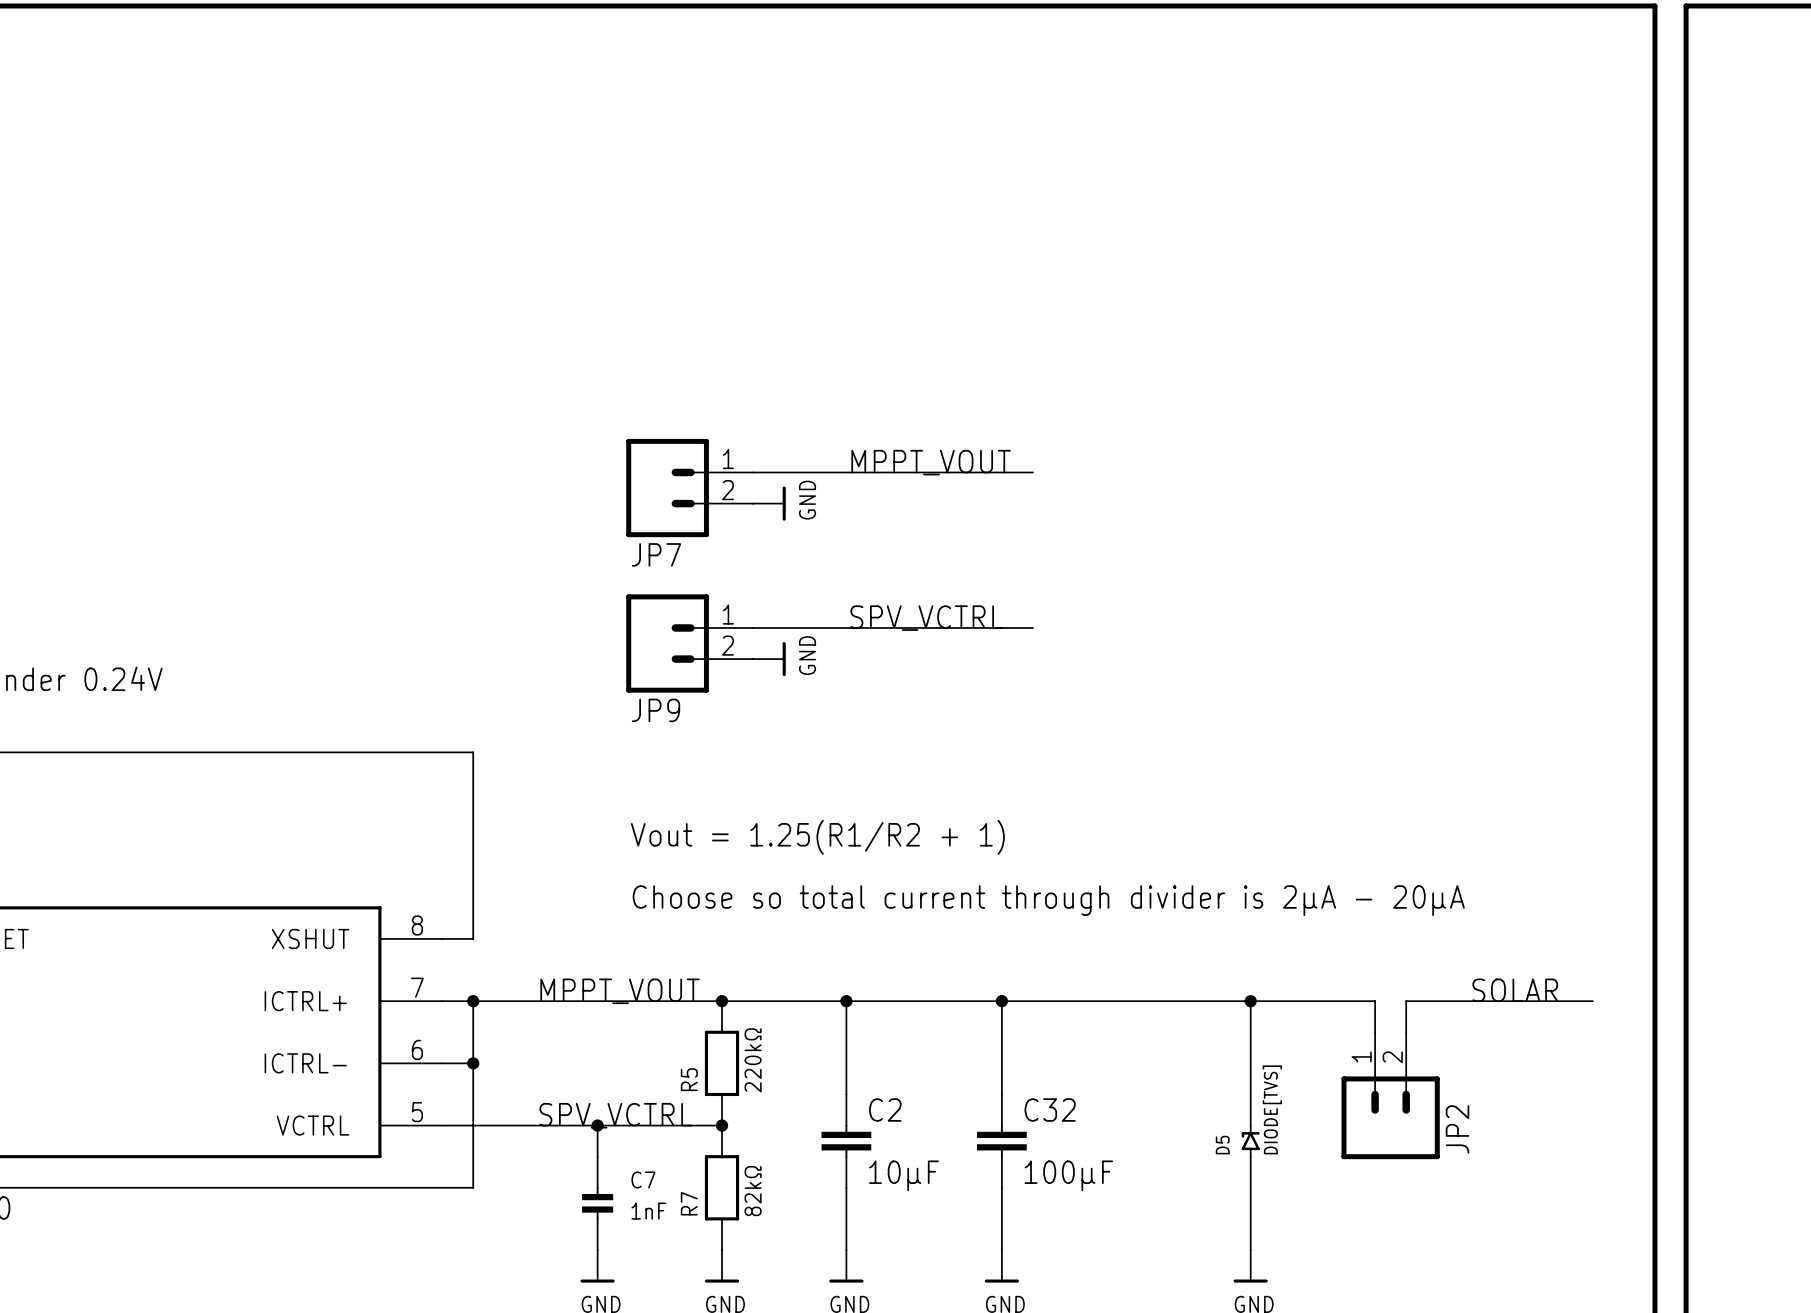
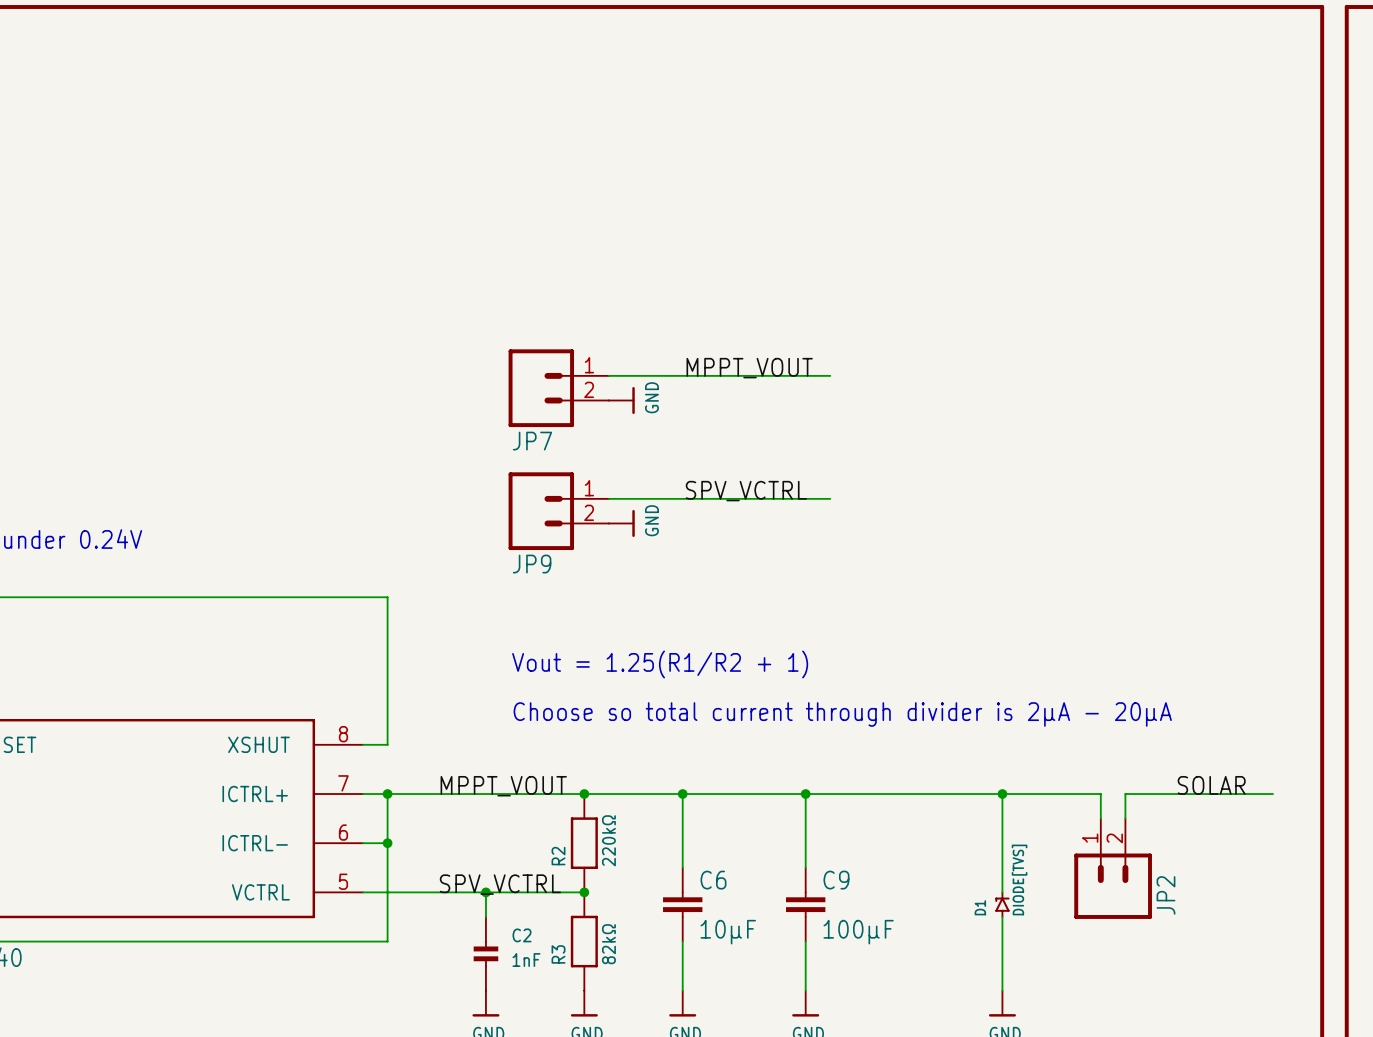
R5 name: R5 (689, 1079) -> R2 (558, 856)
C2 name: C2 (885, 1110) -> C6 (713, 880)
C32 name: C32 (1050, 1110) -> C9 (836, 880)
D5 name: D5 (1222, 1145) -> D1 (980, 907)
C7 name: C7 (643, 1179) -> C2 (522, 935)
R7 name: R7 (689, 1203) -> R3 (558, 954)

